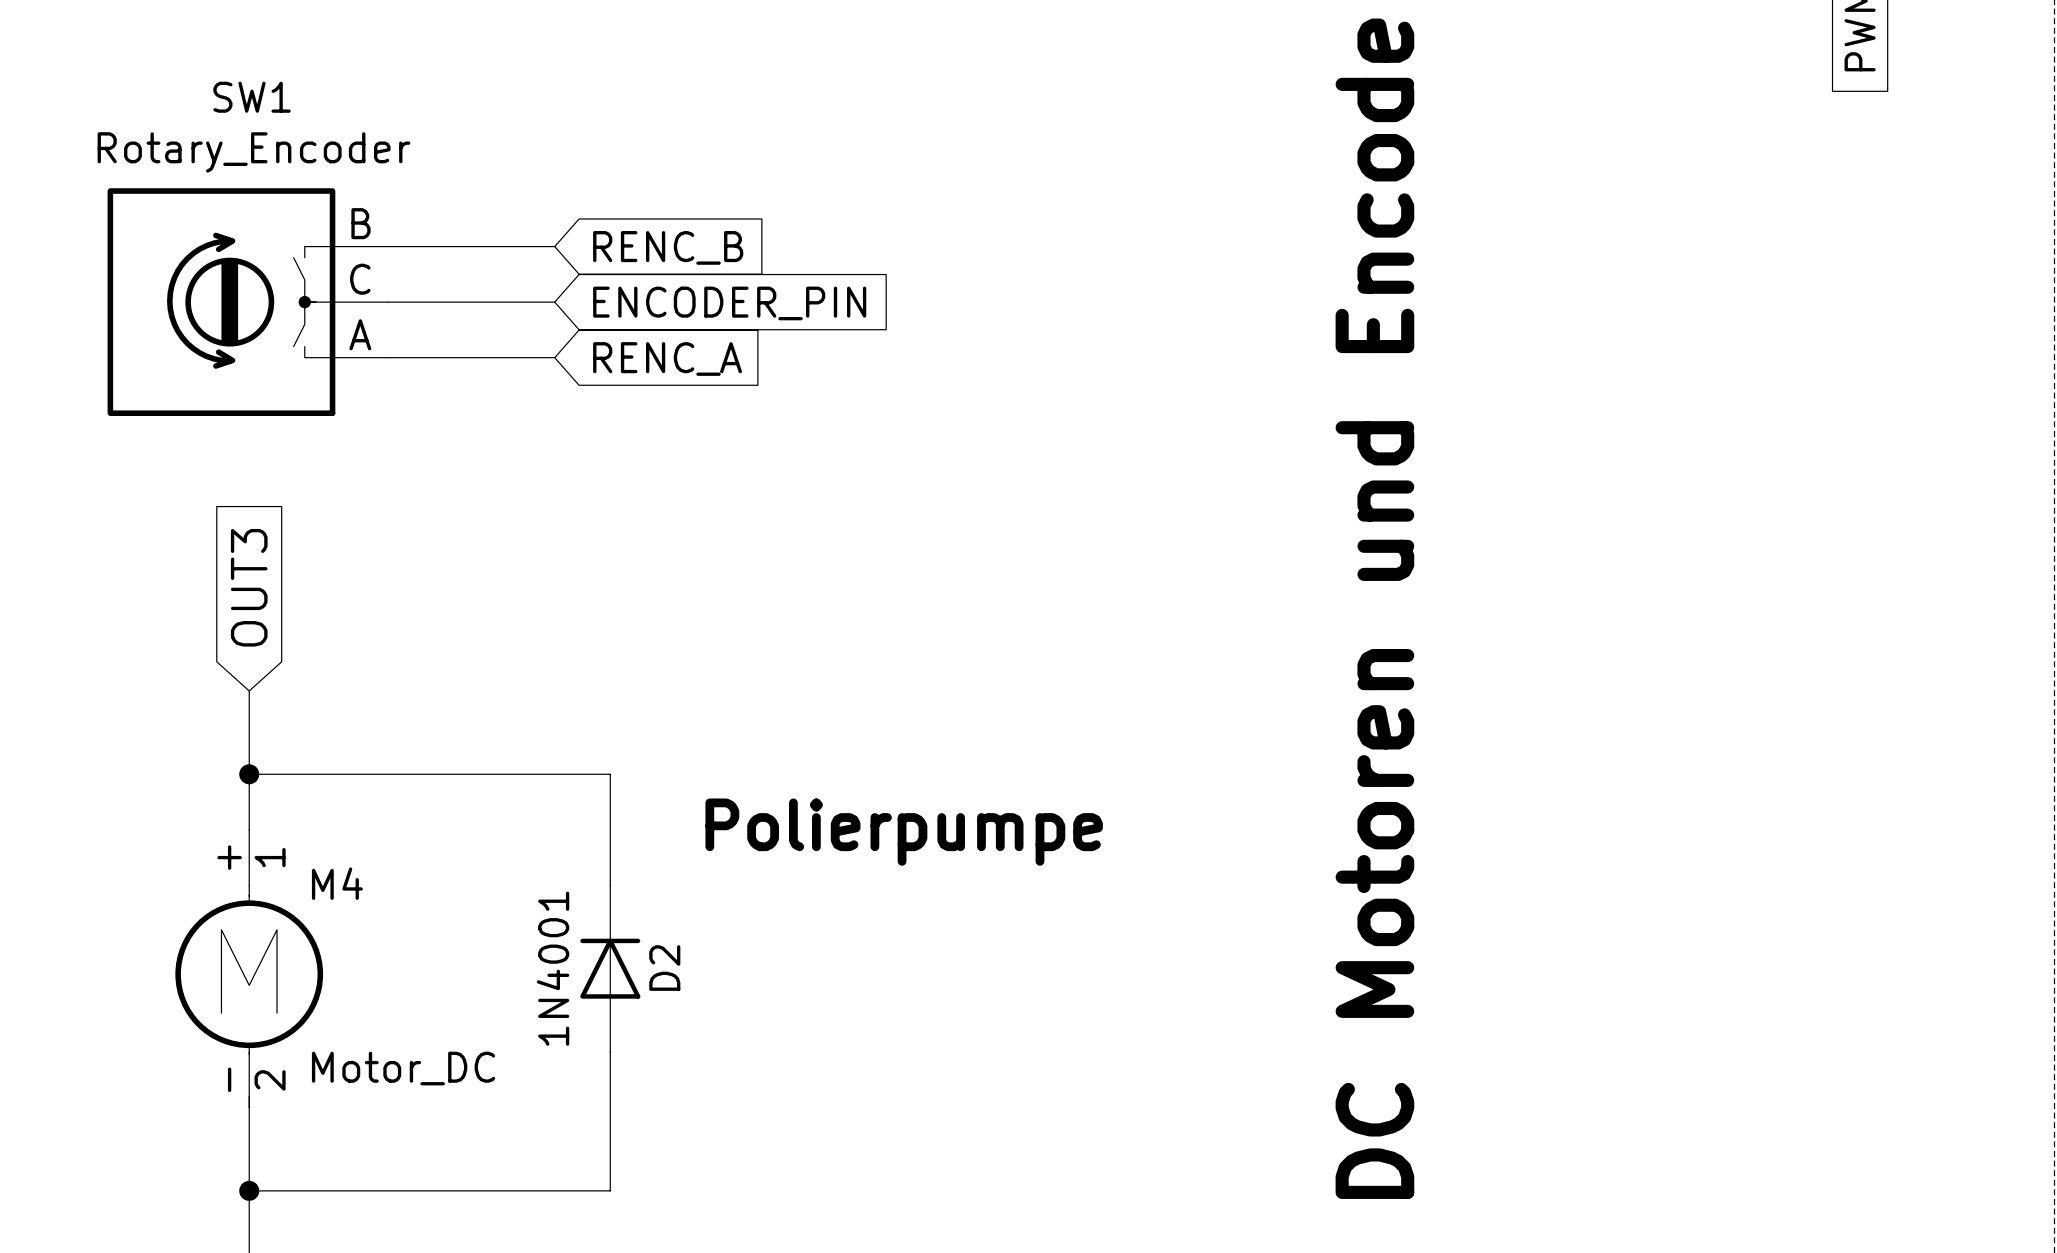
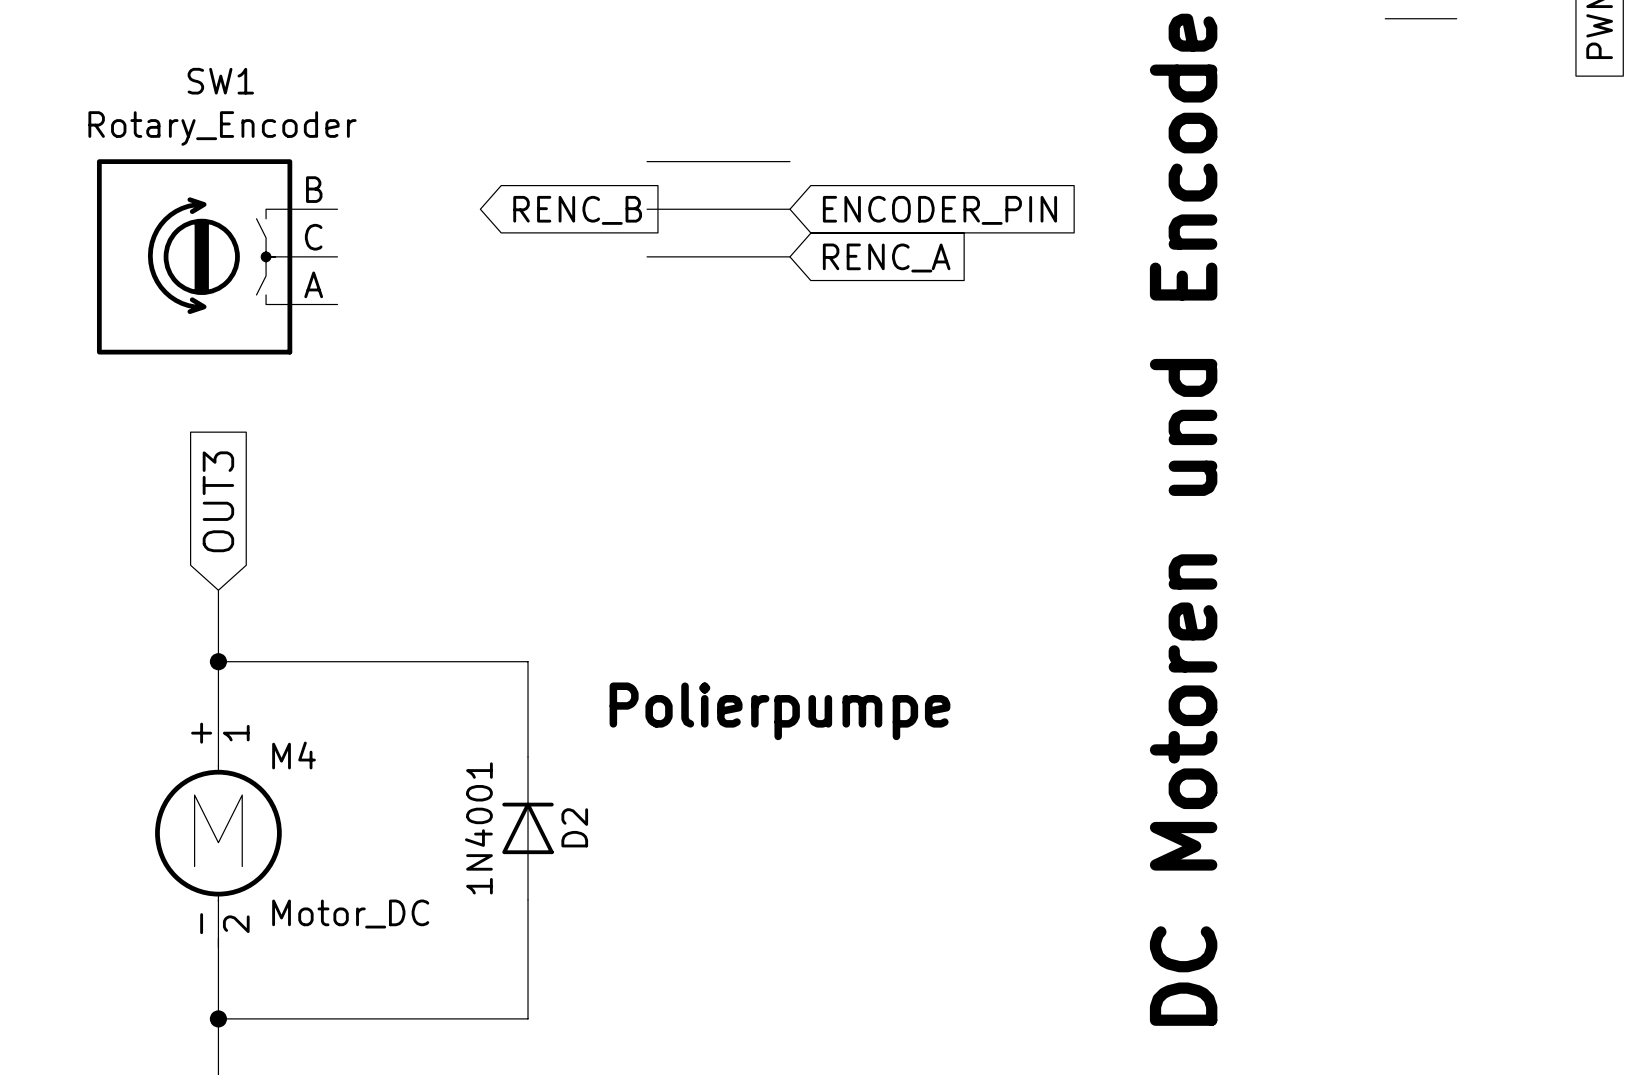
wire: none -> (1385, 18) (1456, 18)
wire: (388, 246) (554, 246) -> (647, 161) (789, 161)
wire: (388, 302) (554, 302) -> (647, 209) (789, 209)
global label position: ENCODER_PIN (729, 303) -> ENCODER_PIN (939, 210)
wire: (388, 357) (554, 357) -> (647, 256) (789, 256)
global label position: RENC_A (667, 358) -> RENC_A (886, 258)

